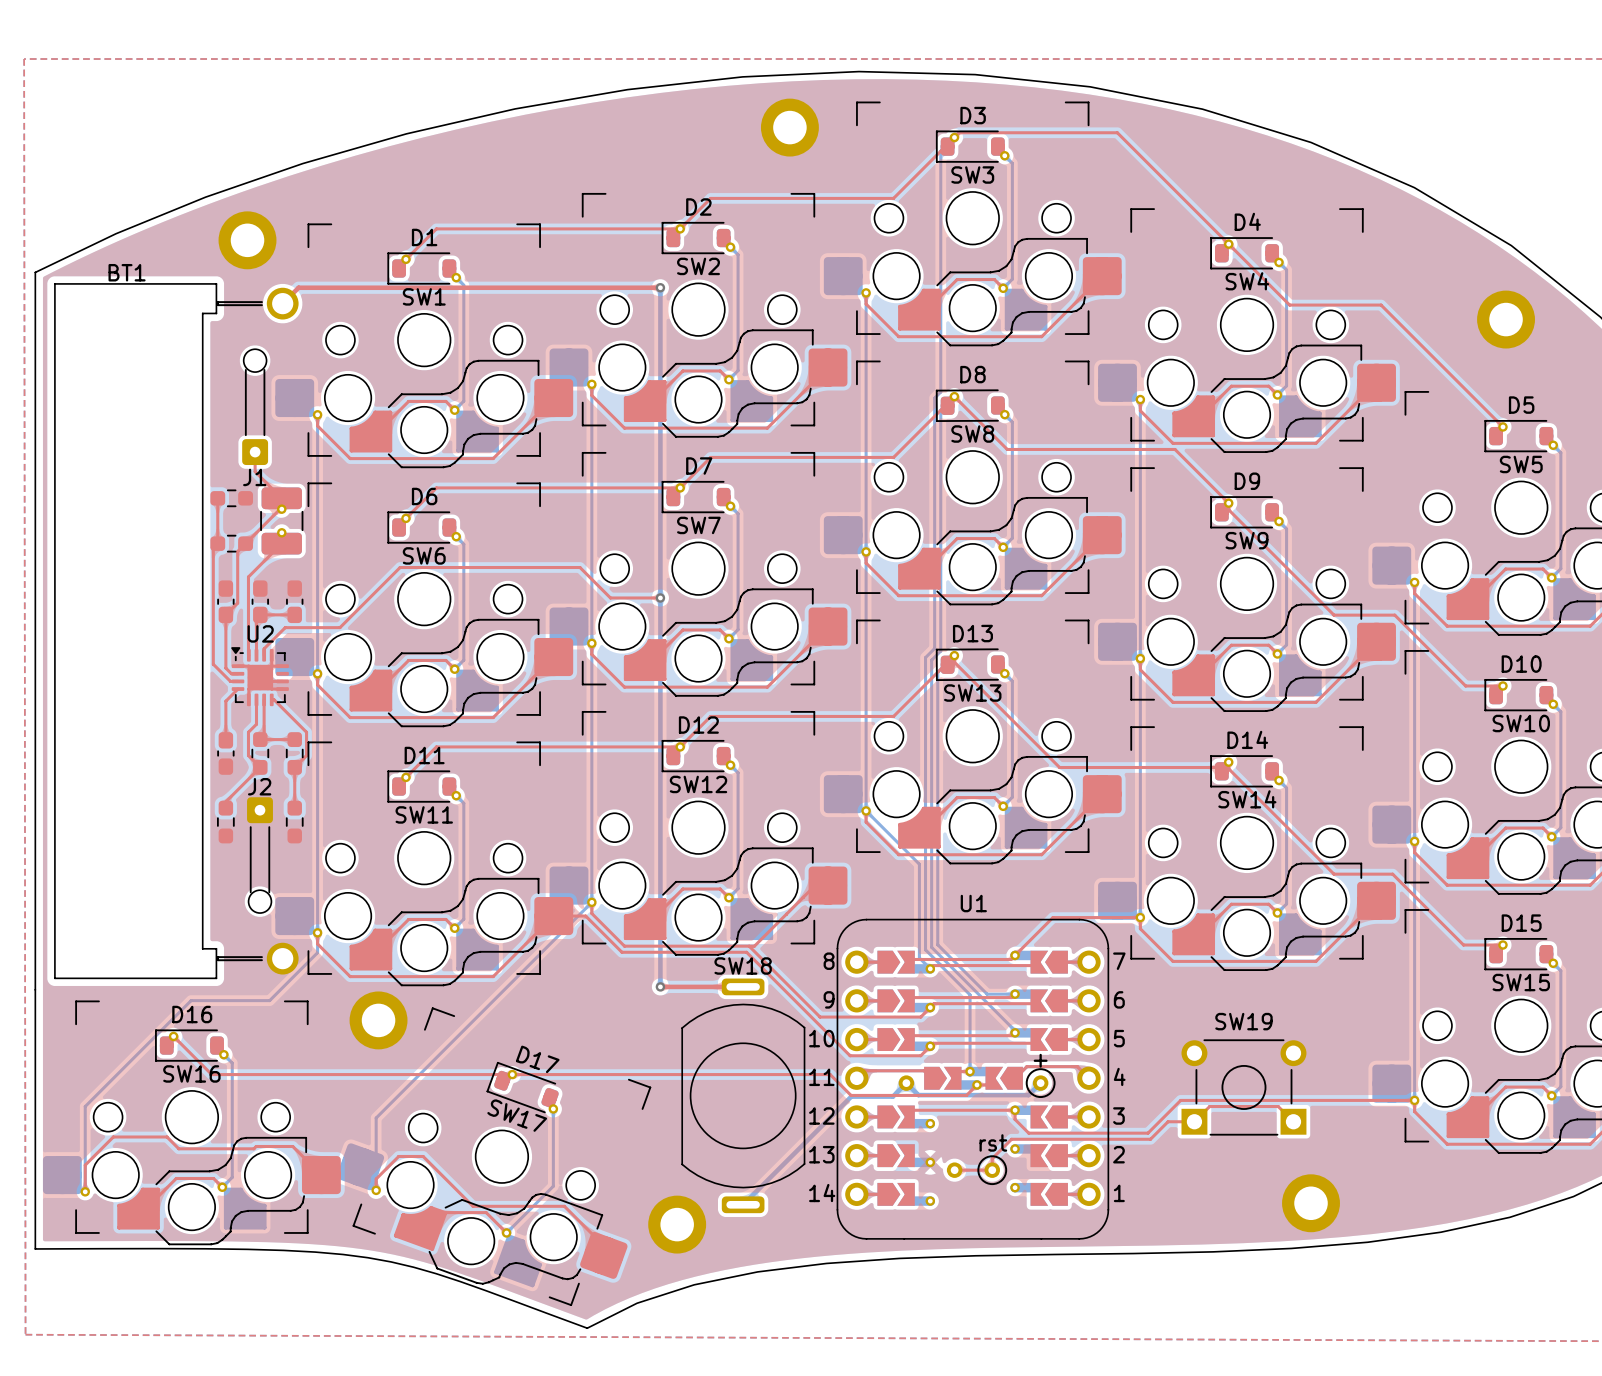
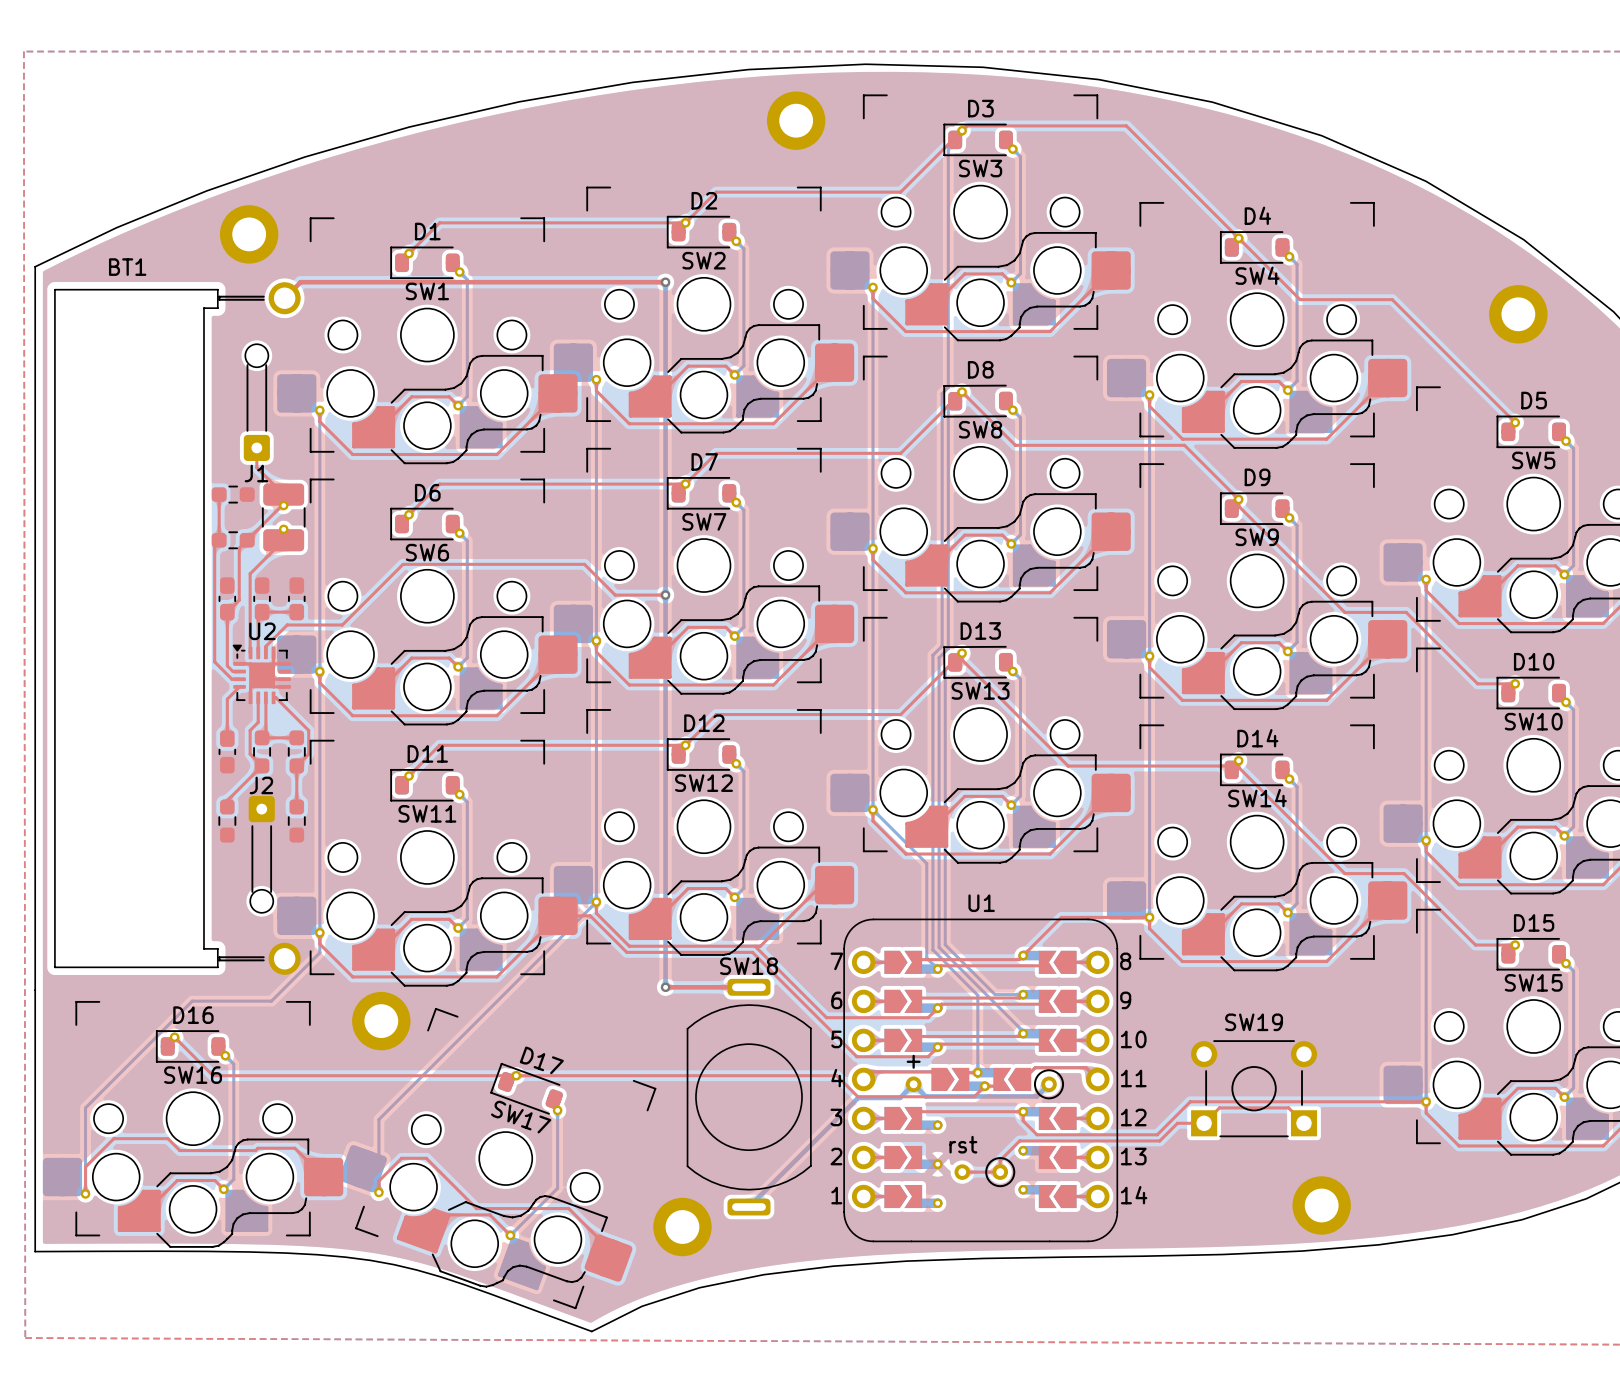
BT1 footprint: [54, 283, 299, 980] -> [54, 282, 301, 975]
U1 footprint: [836, 918, 1110, 1240] -> [843, 918, 1119, 1243]

